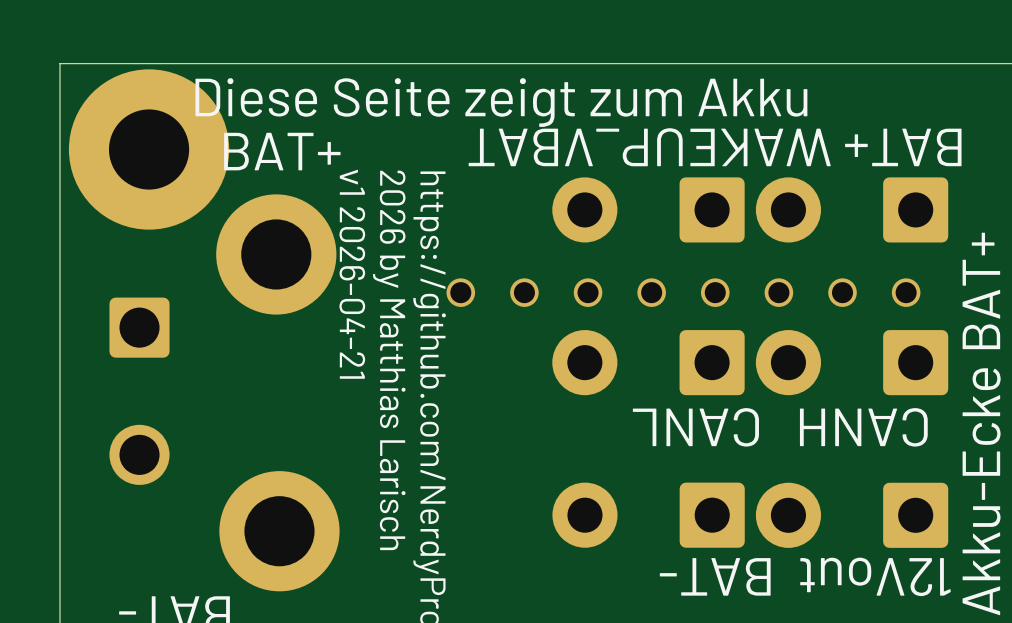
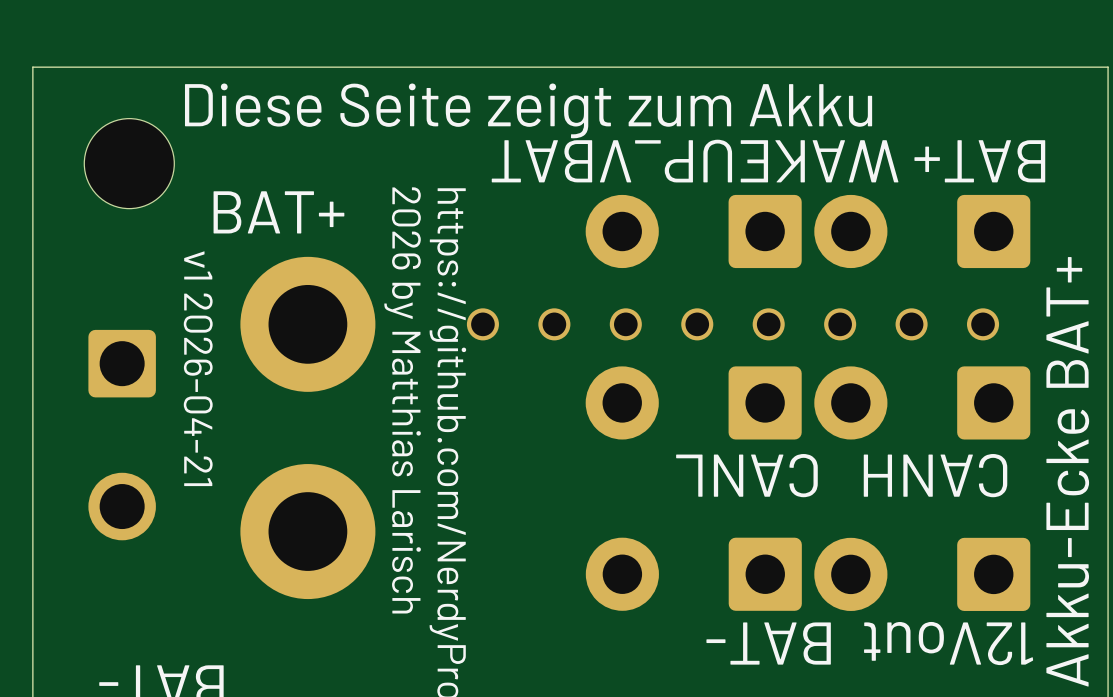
part footprint: [68, 69, 230, 230] -> [84, 118, 175, 209]
text position: BAT+ (282, 151) -> BAT+ (278, 212)
part position: (276, 254) -> (307, 324)
text position: v1 2026-04-21 (352, 274) -> v1 2026-04-21 (198, 368)
part position: (279, 531) -> (307, 531)

